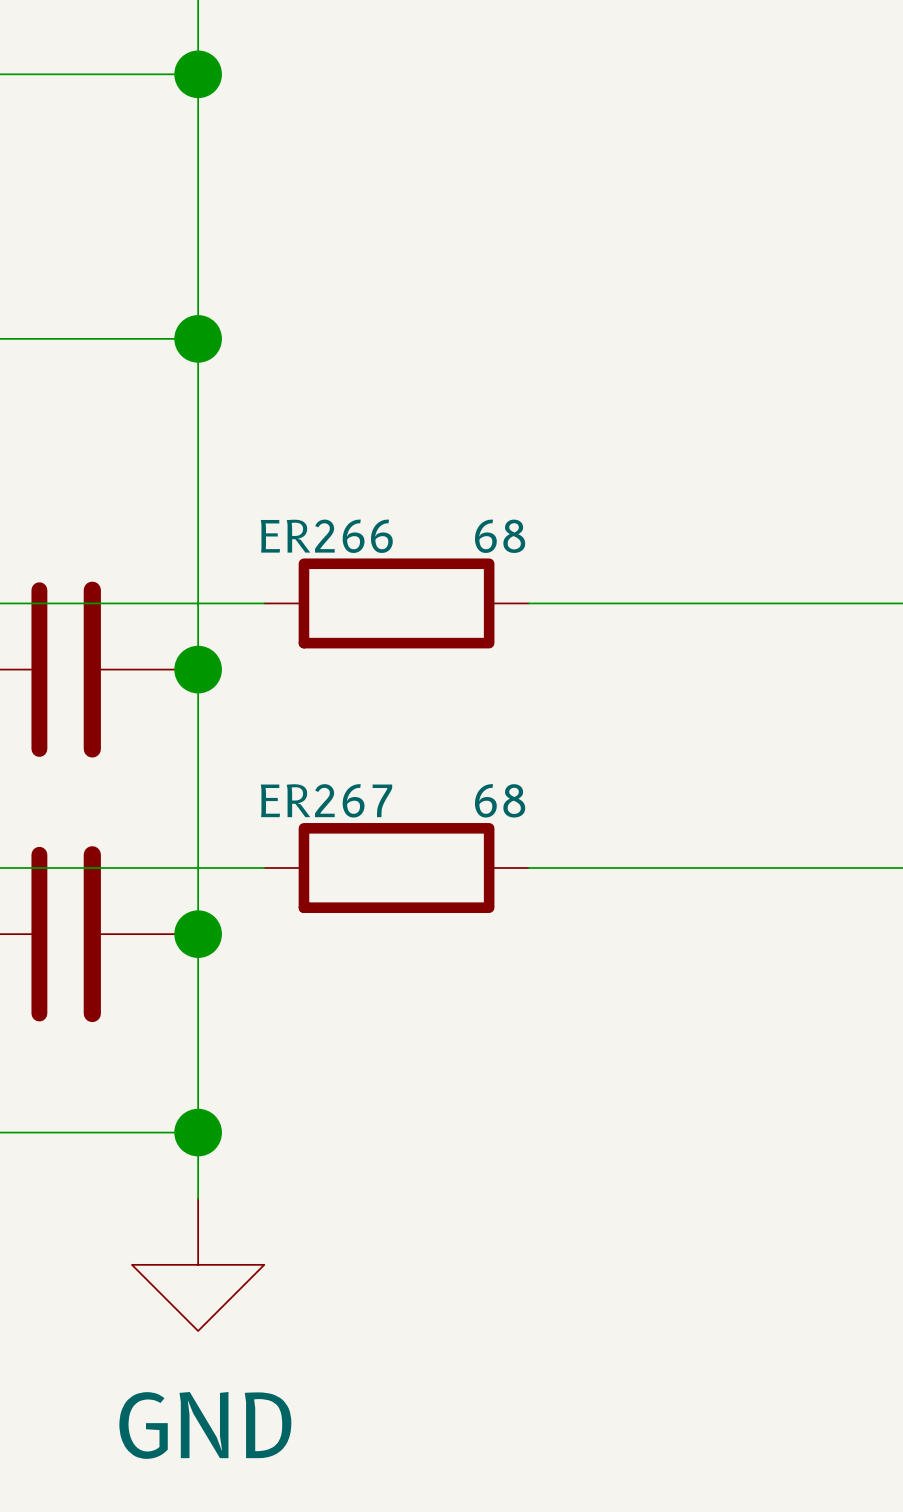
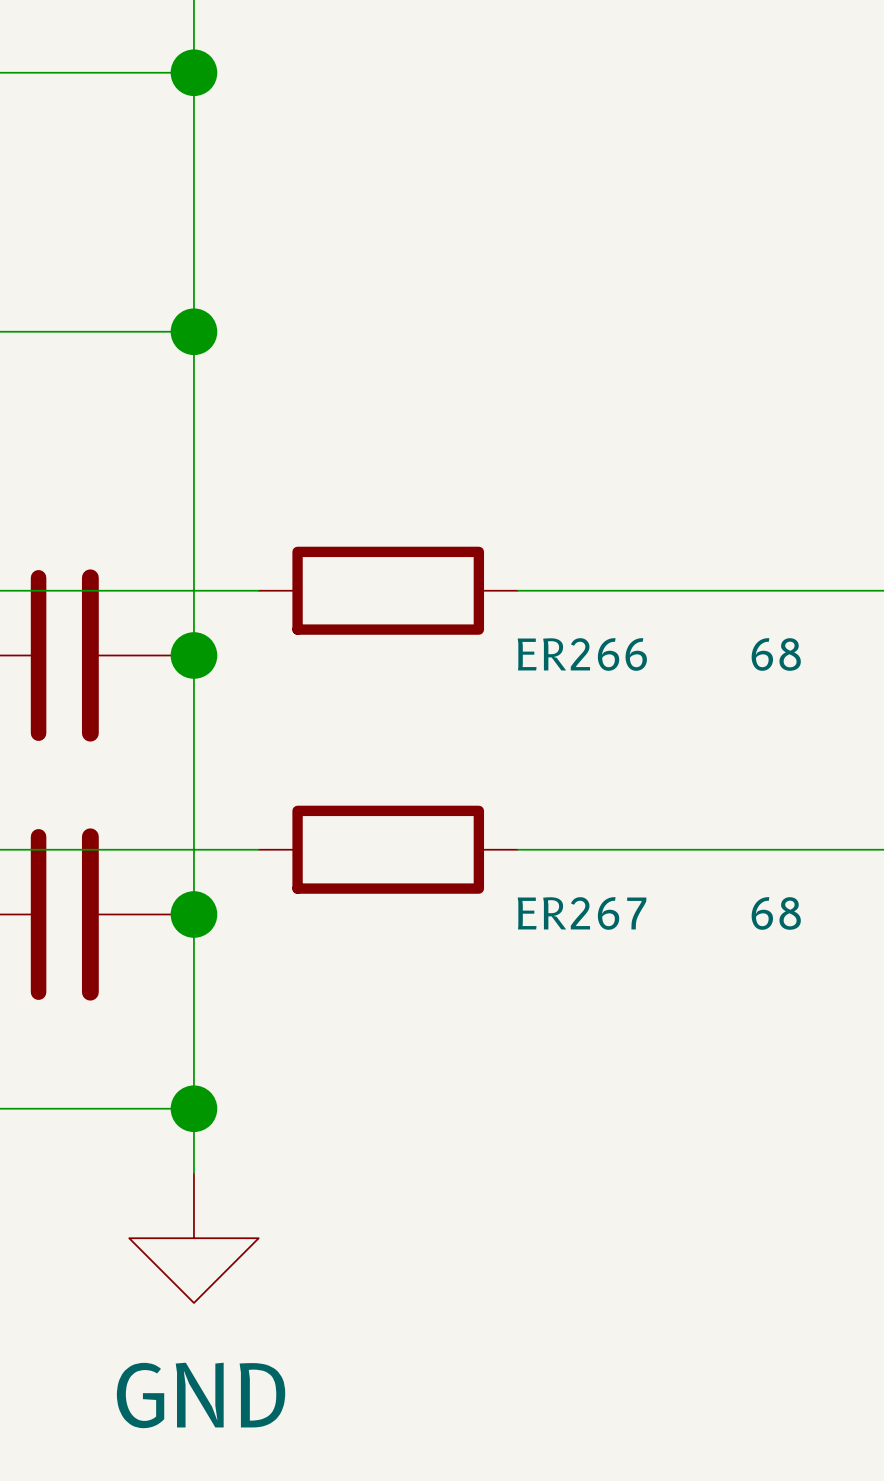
ER266 name position: ER266 (326, 536) -> ER266 (582, 654)
ER266 value position: 68 (500, 536) -> 68 (776, 654)
ER267 name position: ER267 (326, 800) -> ER267 (582, 913)
ER267 value position: 68 (500, 800) -> 68 (776, 913)

